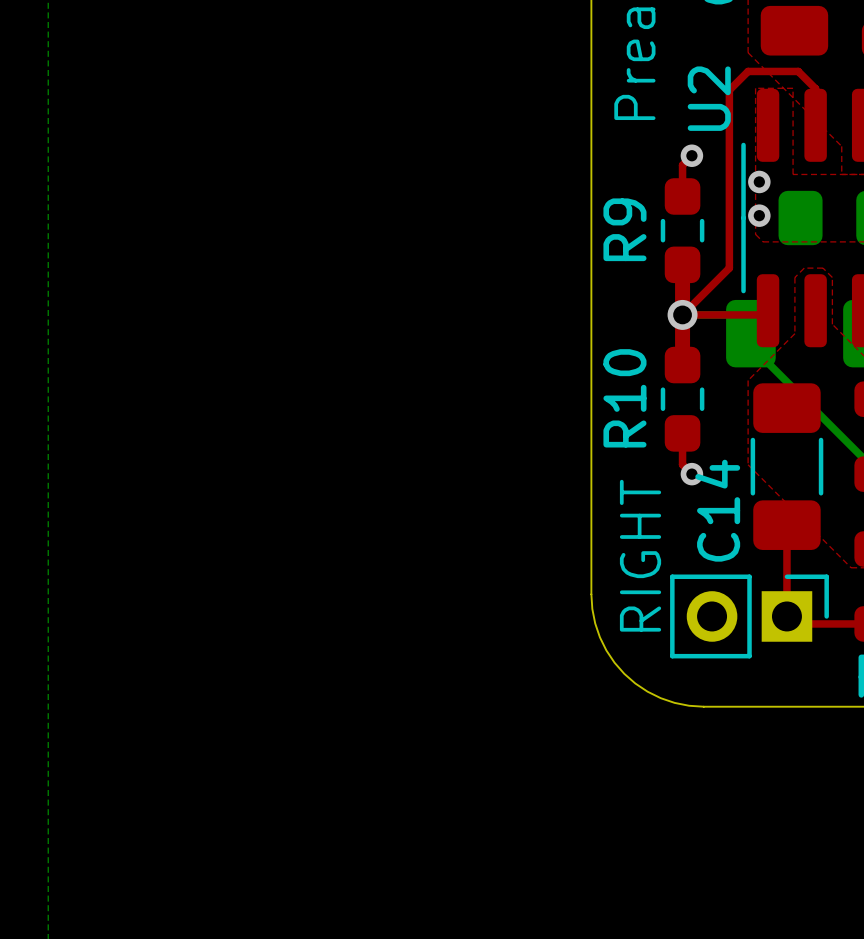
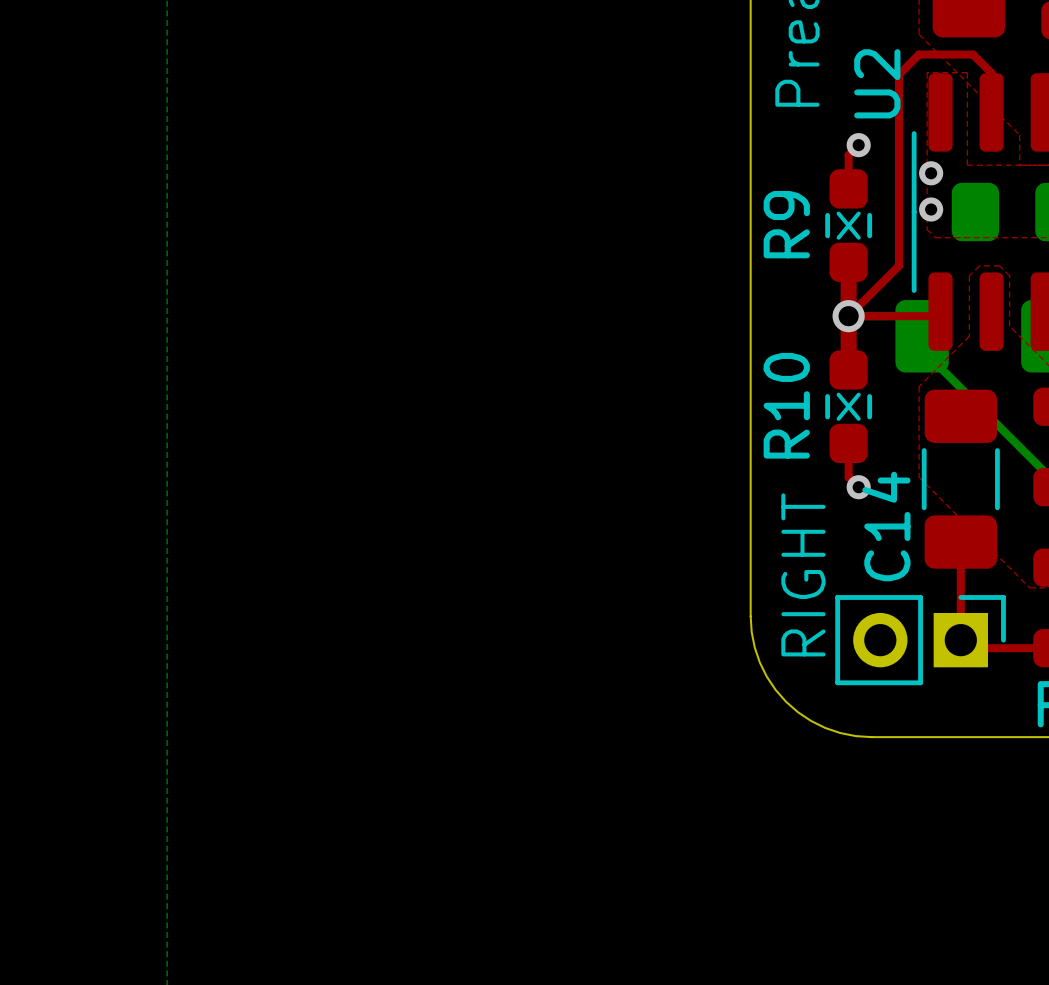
line: none -> (838, 213) (858, 237)
line: none -> (858, 213) (838, 237)
line: none -> (838, 394) (858, 418)
line: none -> (858, 394) (838, 418)

